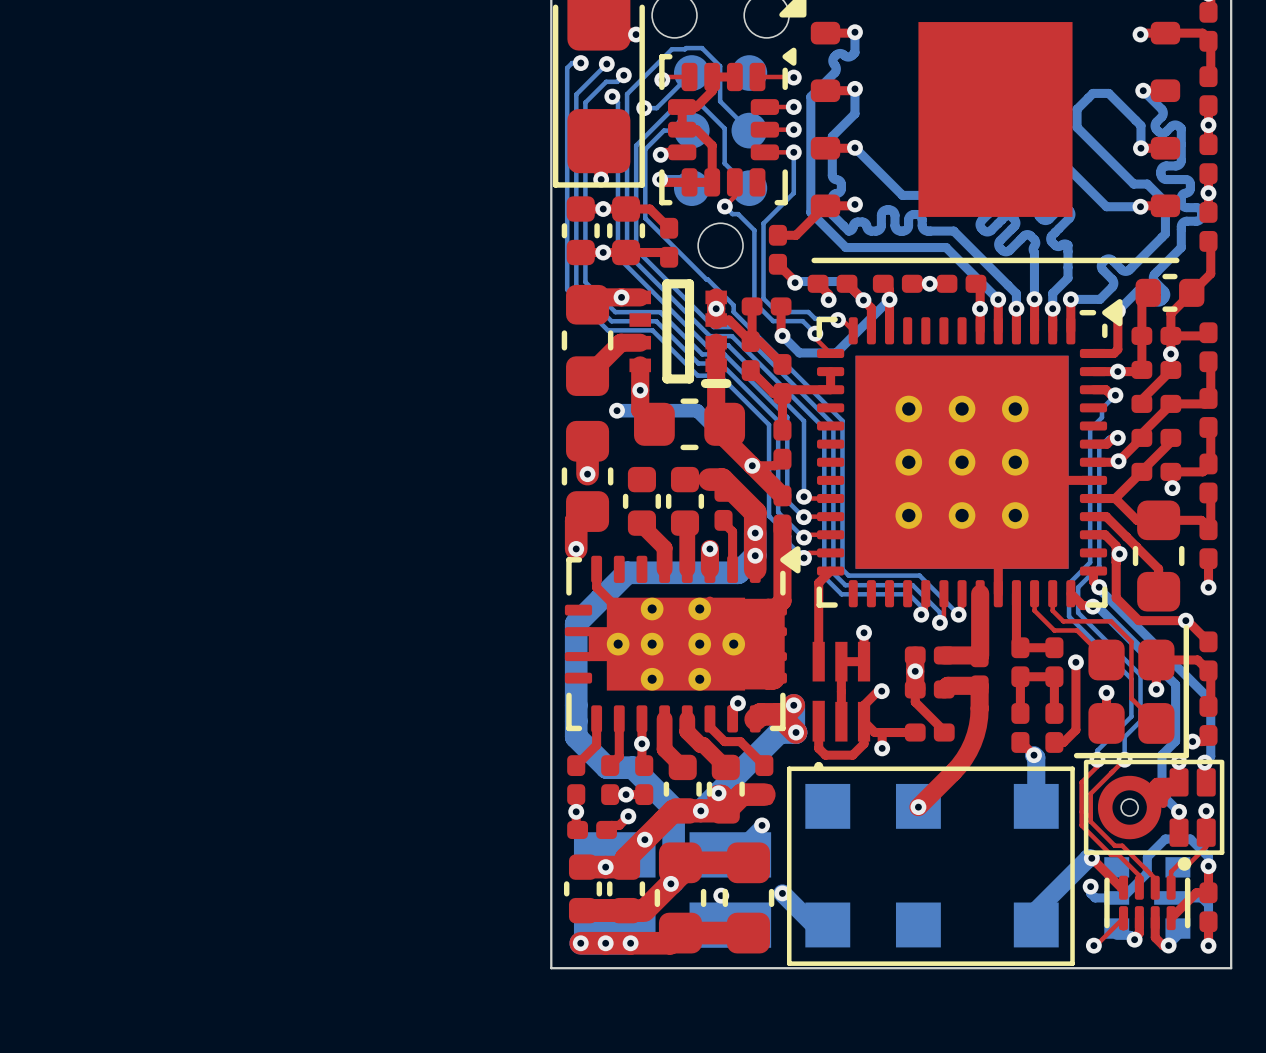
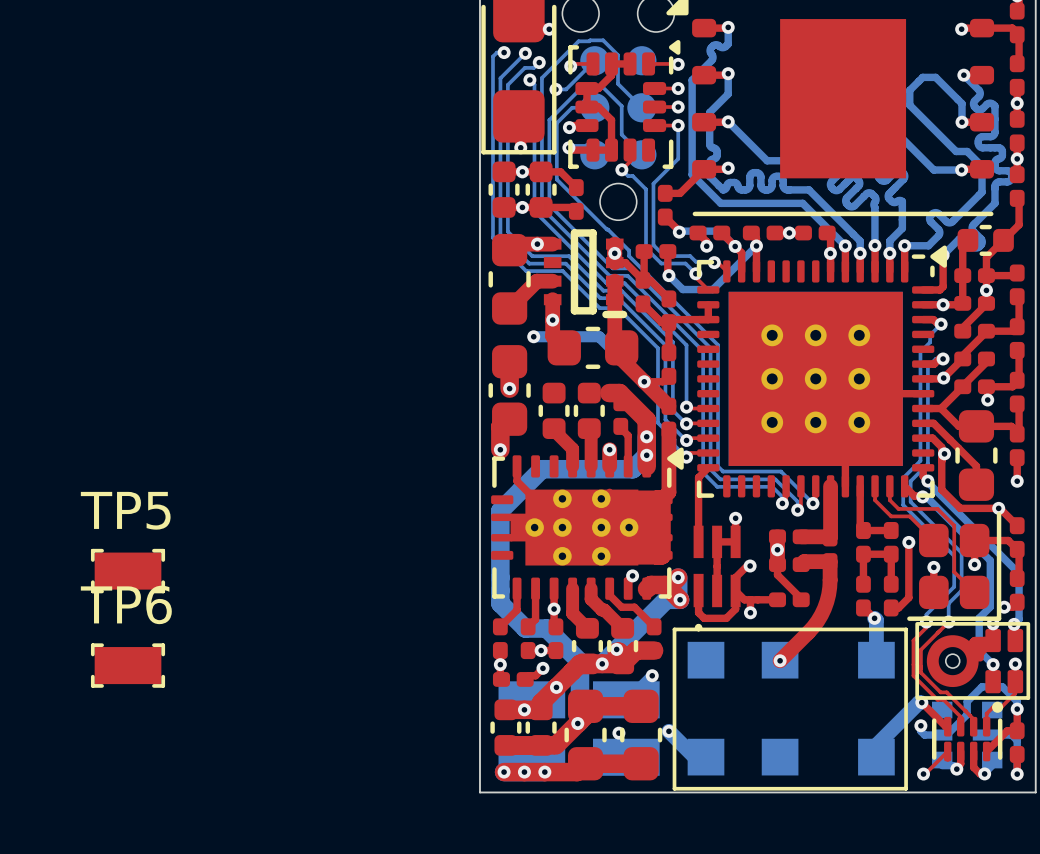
TP5: none -> (128, 571)
TP6: none -> (128, 665)

